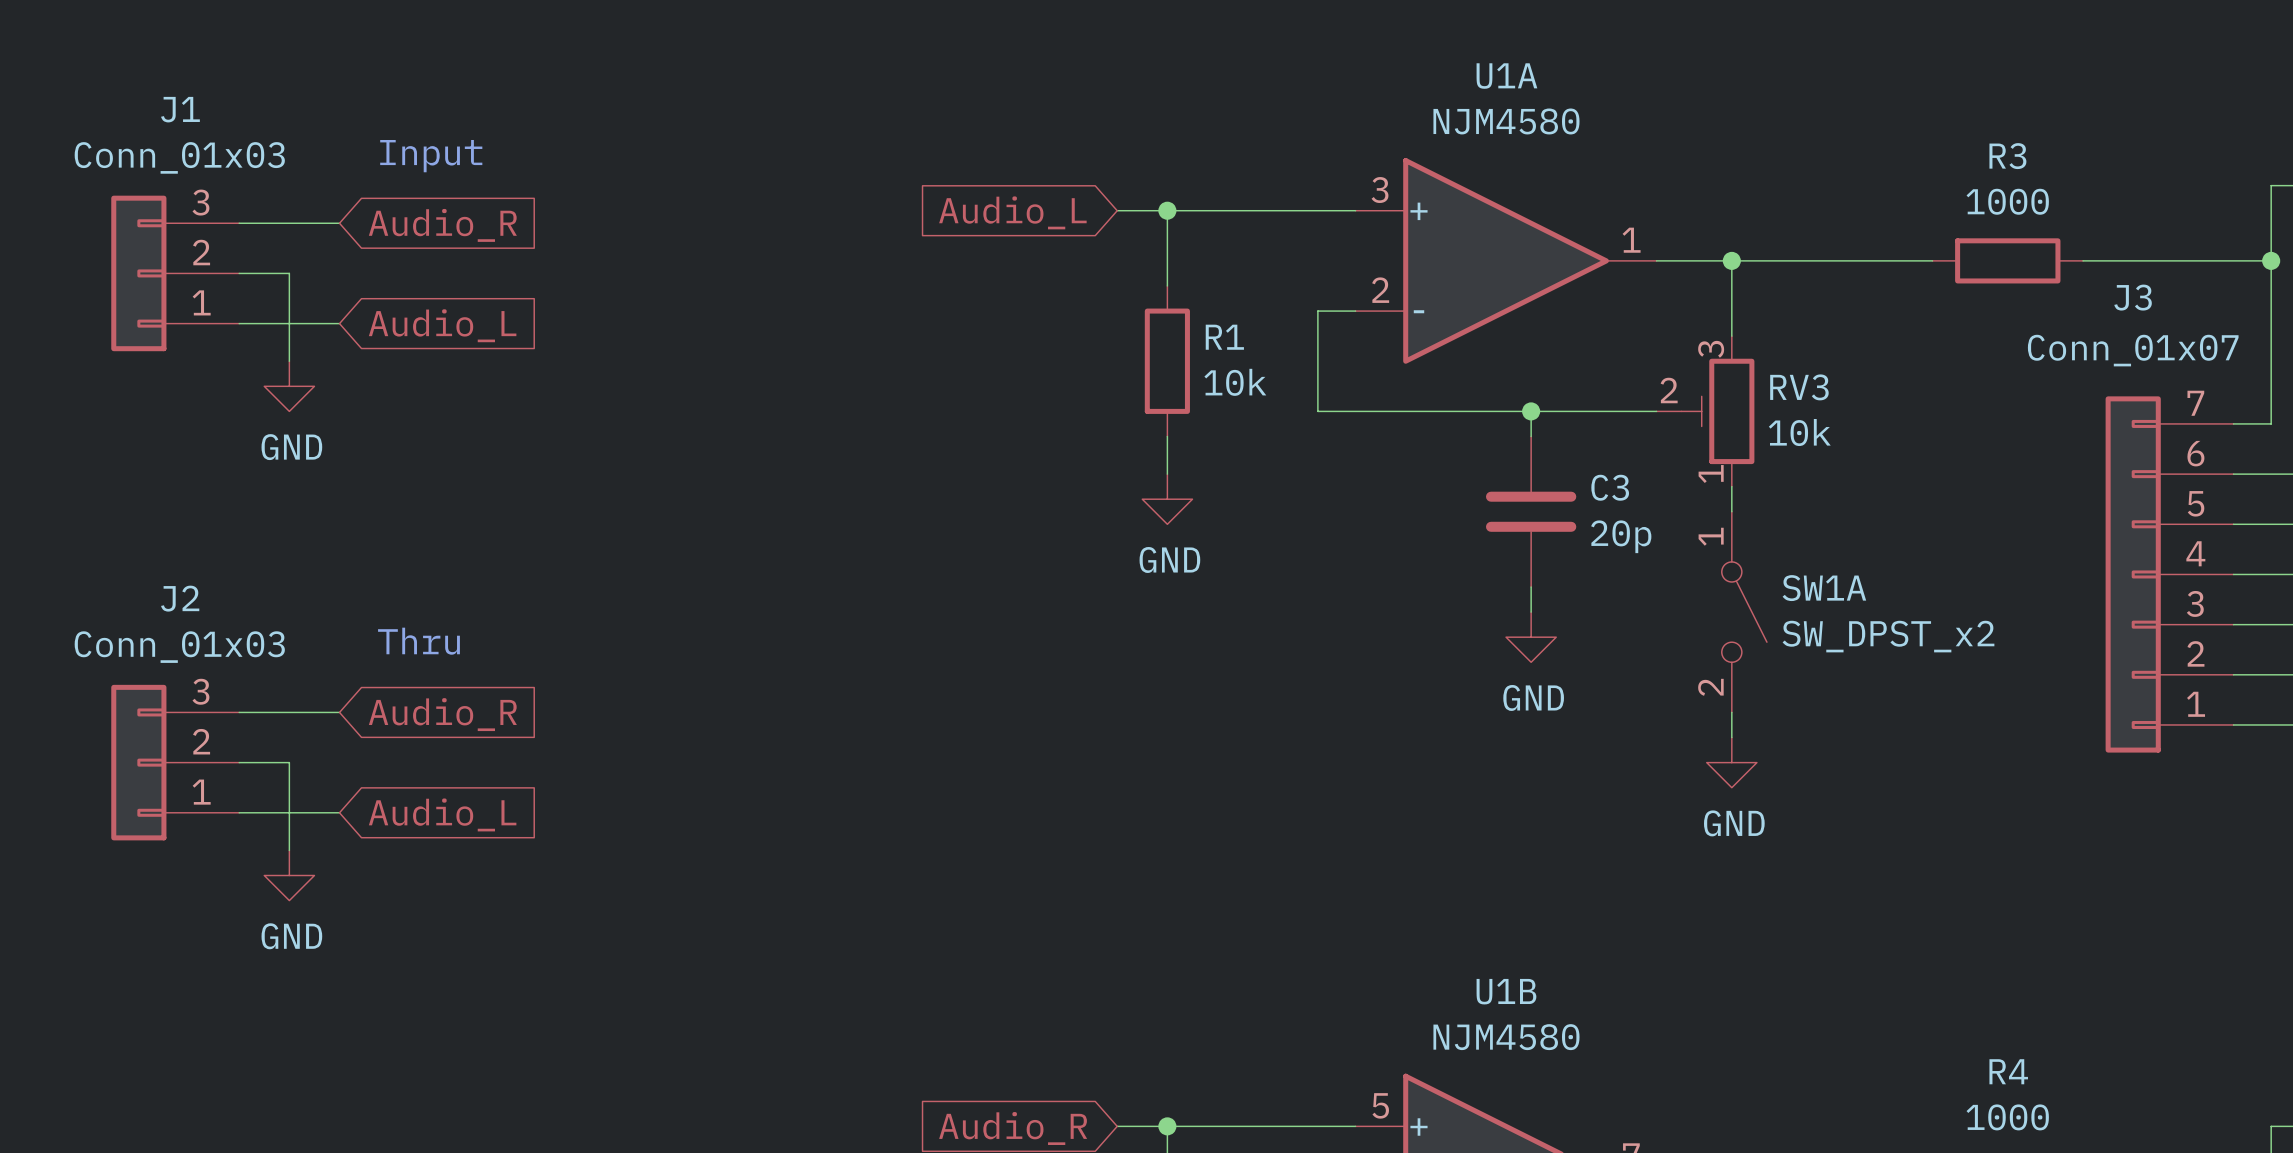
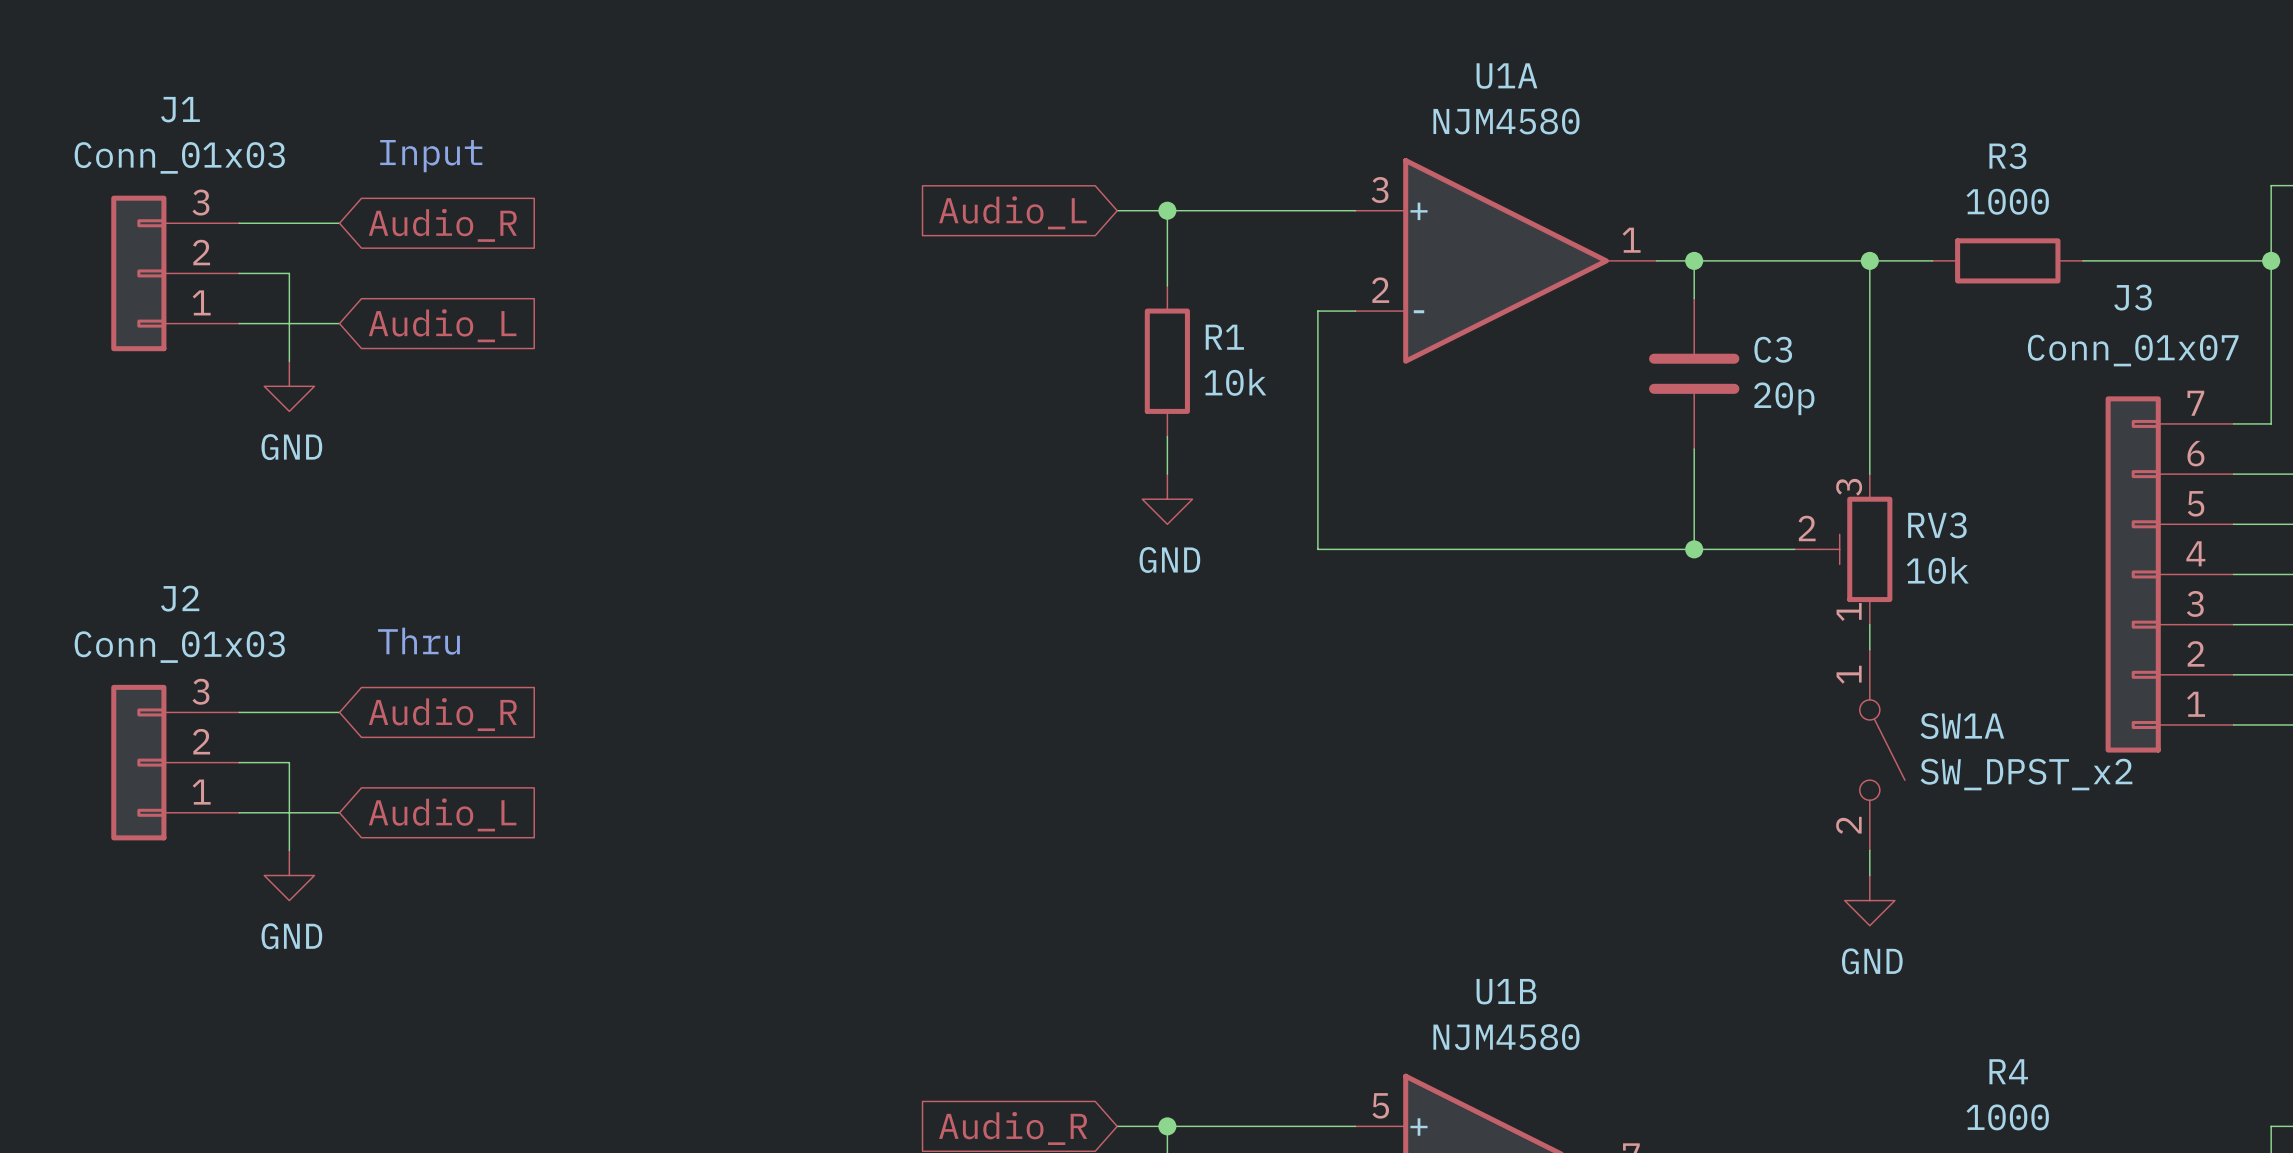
wire: none -> (1694, 260) (1694, 298)
wire: (1731, 260) (1731, 336) -> none
junction position: (1731, 260) -> (1694, 260)
wire: none -> (1869, 260) (1869, 474)
junction: none -> (1869, 260)
wire: (1317, 411) (1656, 411) -> (1317, 411) (1317, 549) (1794, 549)
wire: (1531, 411) (1531, 436) -> none
junction: (1531, 411) -> none
RV3 position: (1705, 411) -> (1843, 549)
wire: none -> (1694, 449) (1694, 549)
wire: (1731, 486) (1731, 511) -> (1869, 624) (1869, 649)
C3 position: (1531, 511) -> (1694, 373)
junction: none -> (1694, 549)
wire: (1531, 587) (1531, 612) -> none
SW1A position: (1744, 612) -> (1882, 750)
power symbol: GND (1531, 637) -> none
wire: (1731, 712) (1731, 737) -> (1869, 850) (1869, 875)
power symbol position: GND (1731, 762) -> GND (1869, 900)

